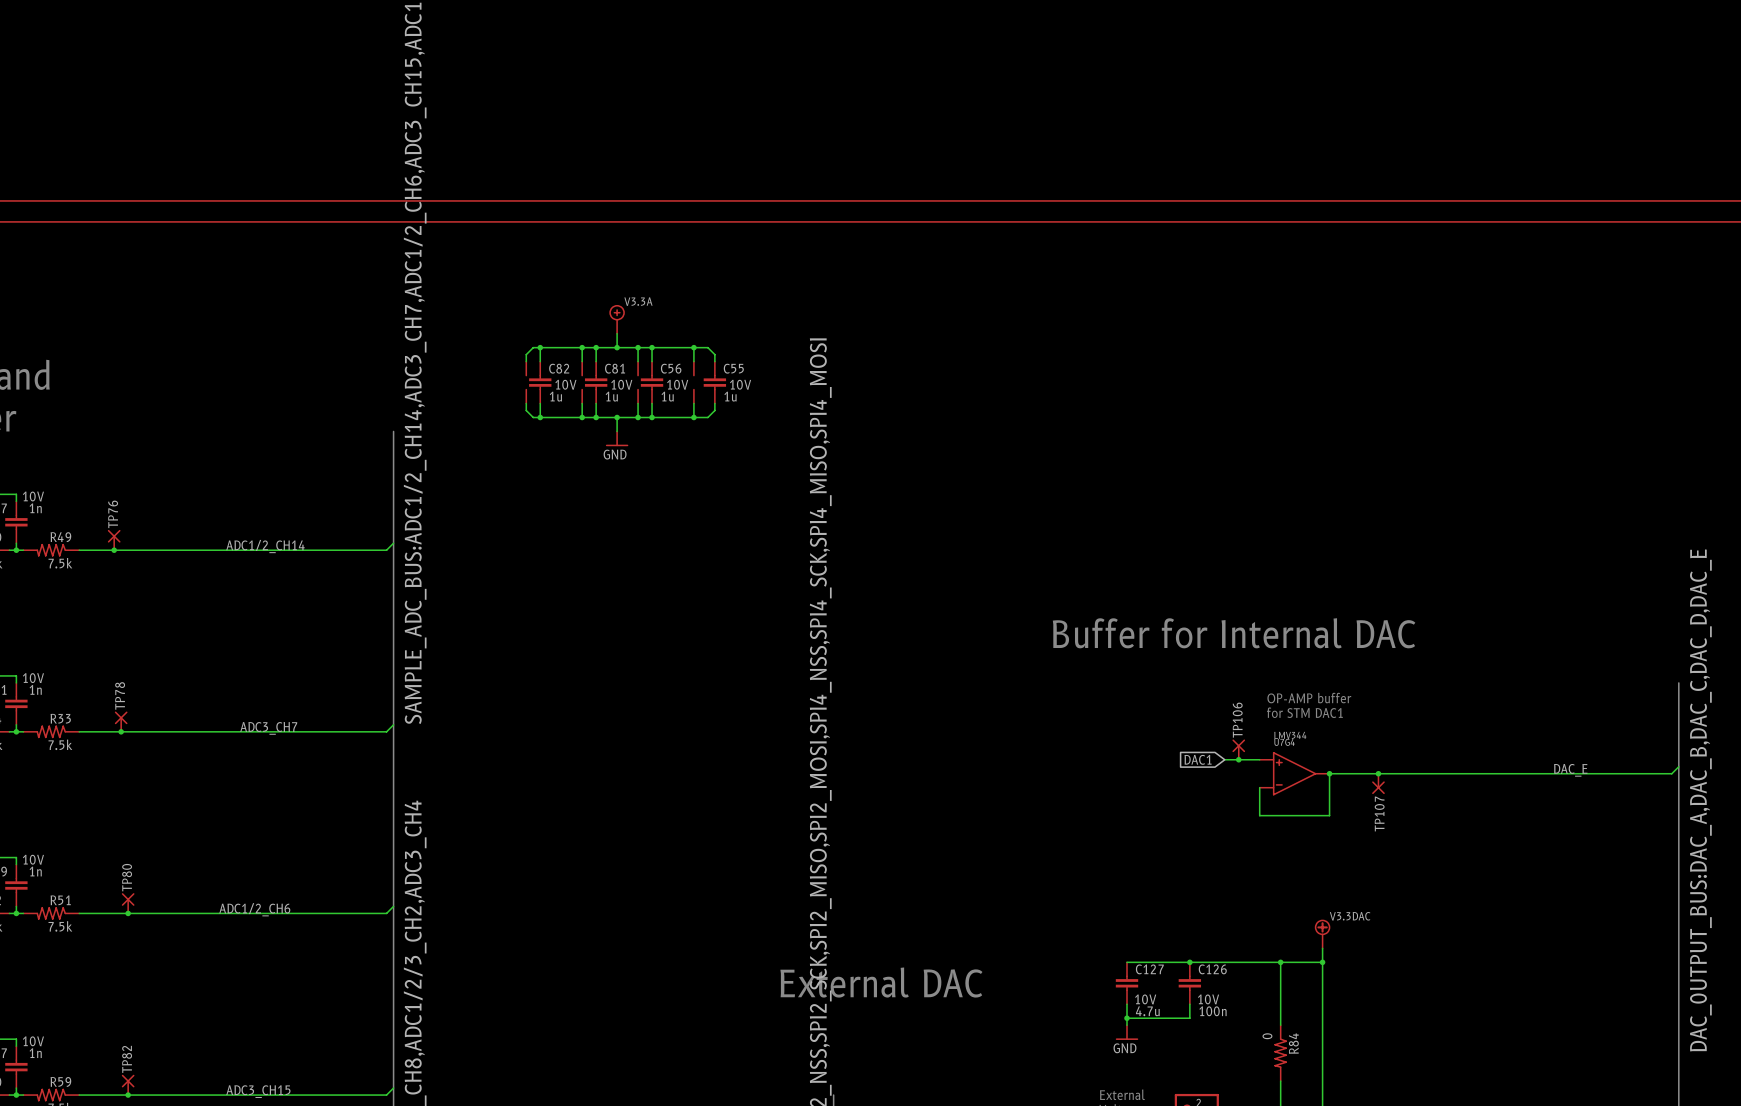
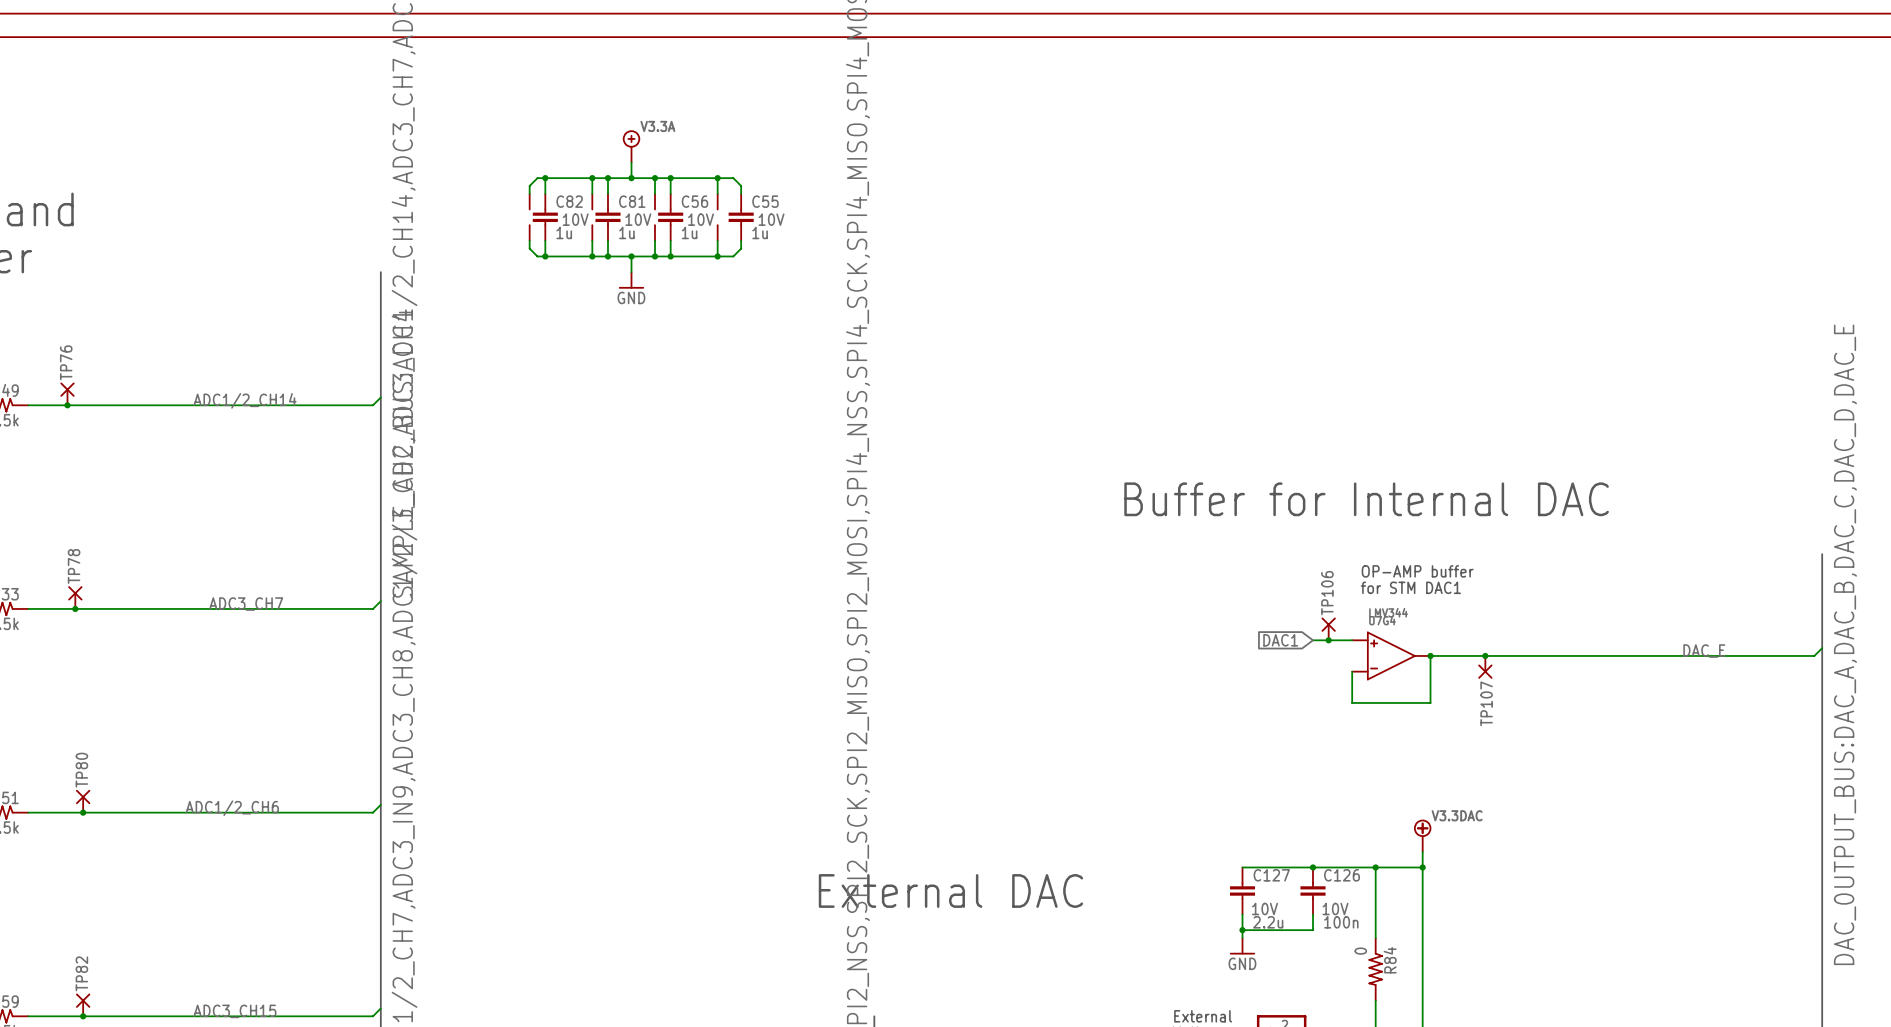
wire: (1126, 962) (1161, 962) -> none
junction: (1189, 962) -> none
junction: none -> (1313, 867)
C127 position: (1126, 983) -> (1242, 890)
C126 position: (1189, 983) -> (1313, 890)
wire: (1126, 1004) (1126, 1025) -> (1242, 914) (1242, 937)
wire: (1189, 1004) (1189, 1018) -> (1313, 914) (1313, 930) (1273, 930)
C127 value: 4.7u (1147, 1011) -> 2.2u (1268, 922)
wire: (1126, 1018) (1161, 1018) -> none
junction: (1126, 1018) -> none
junction: none -> (1242, 930)
power symbol position: GND (1126, 1032) -> GND (1242, 946)

